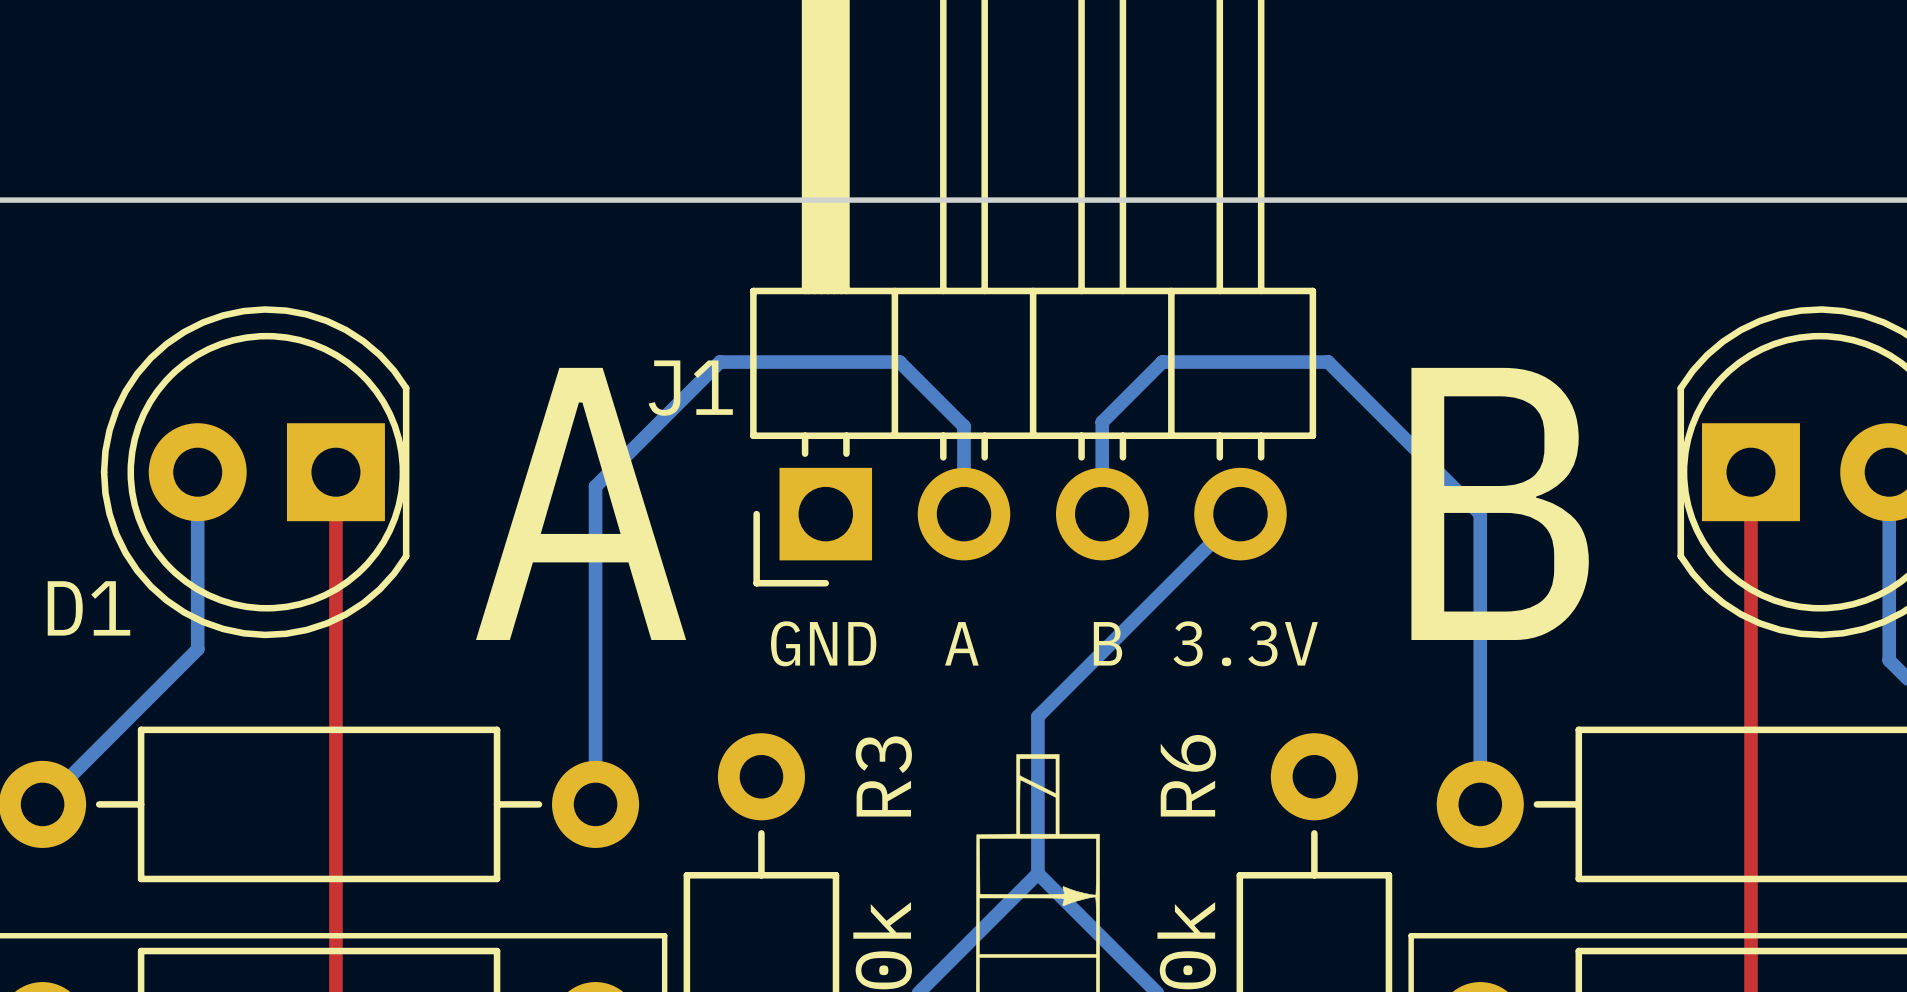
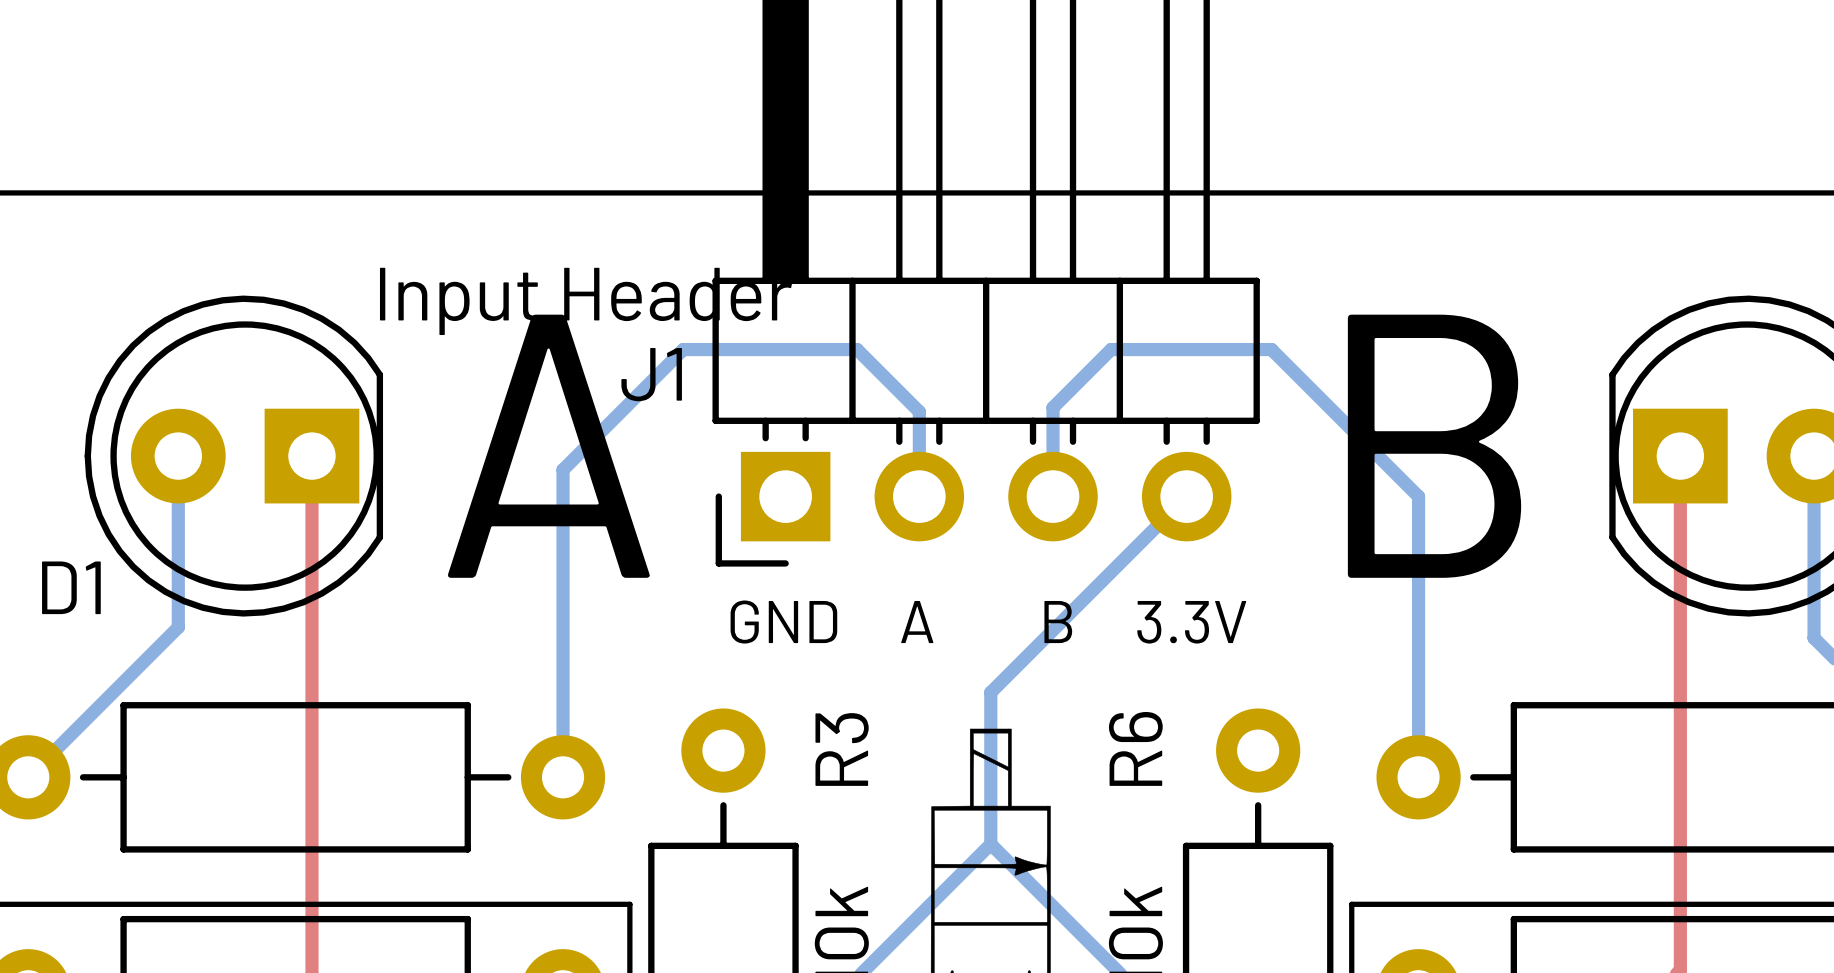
J1 value: none -> Input Header (586, 301)
text position: A (581, 503) -> A (548, 446)
text position: B (1500, 503) -> B (1434, 446)

